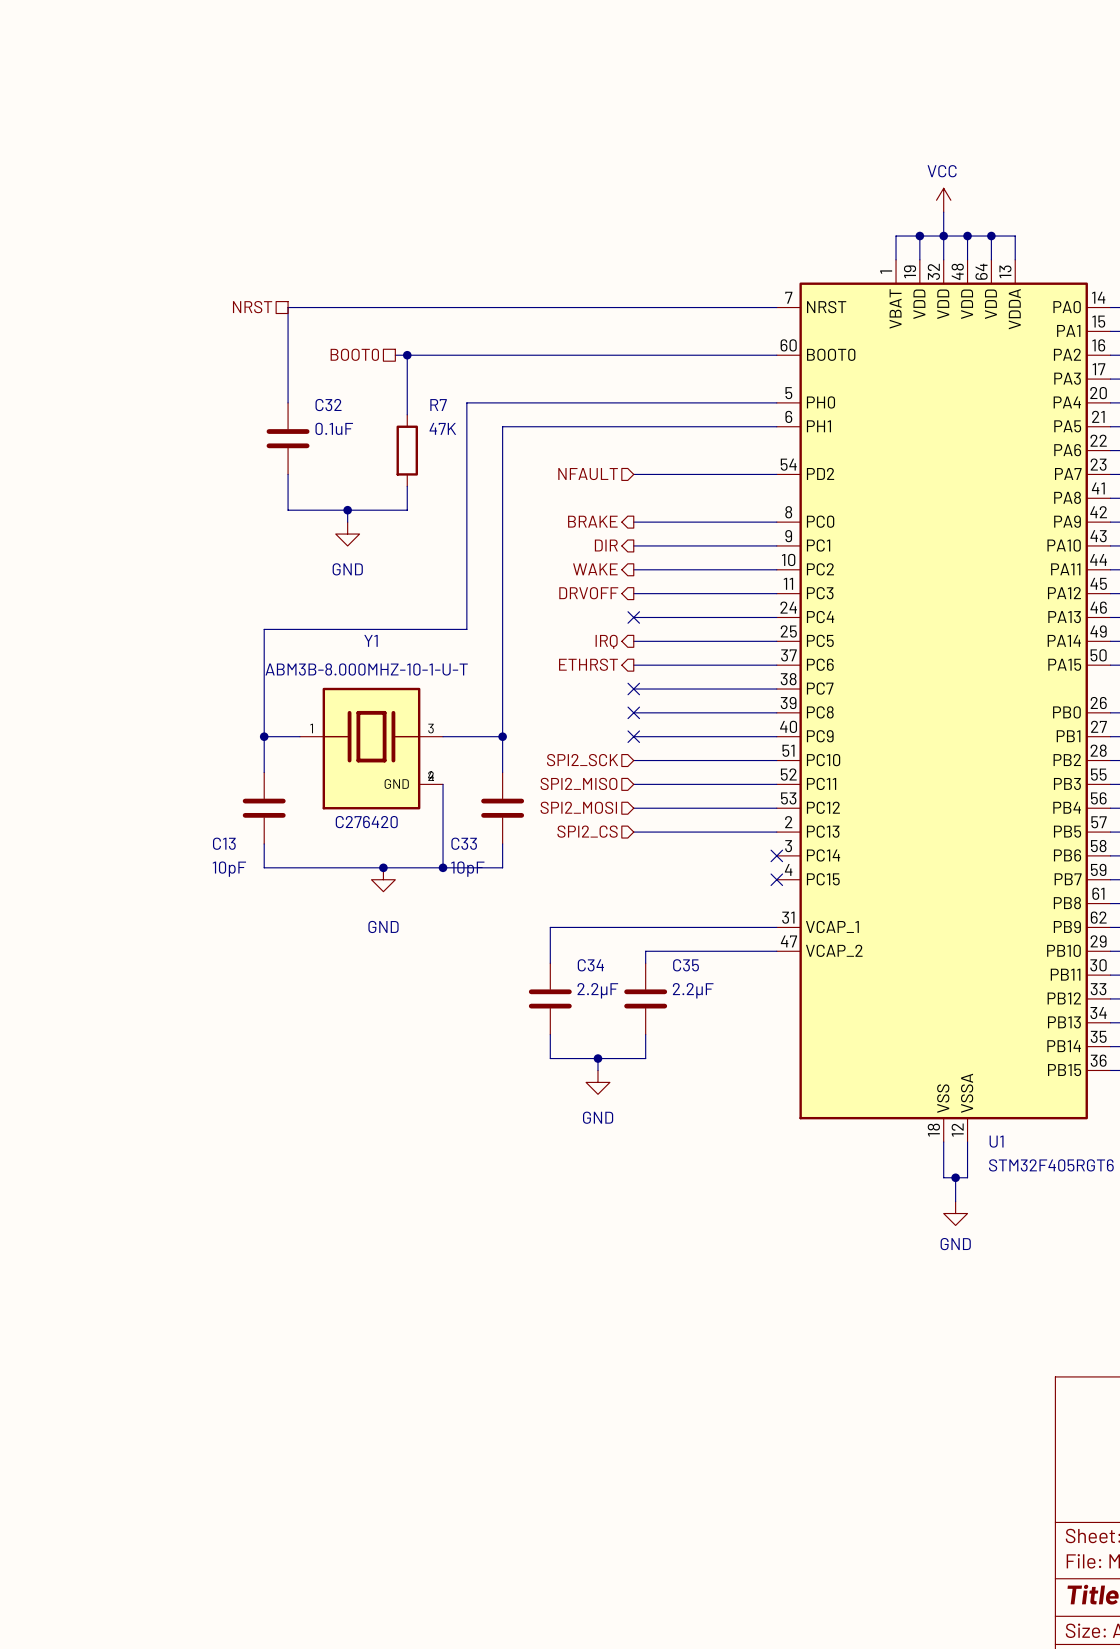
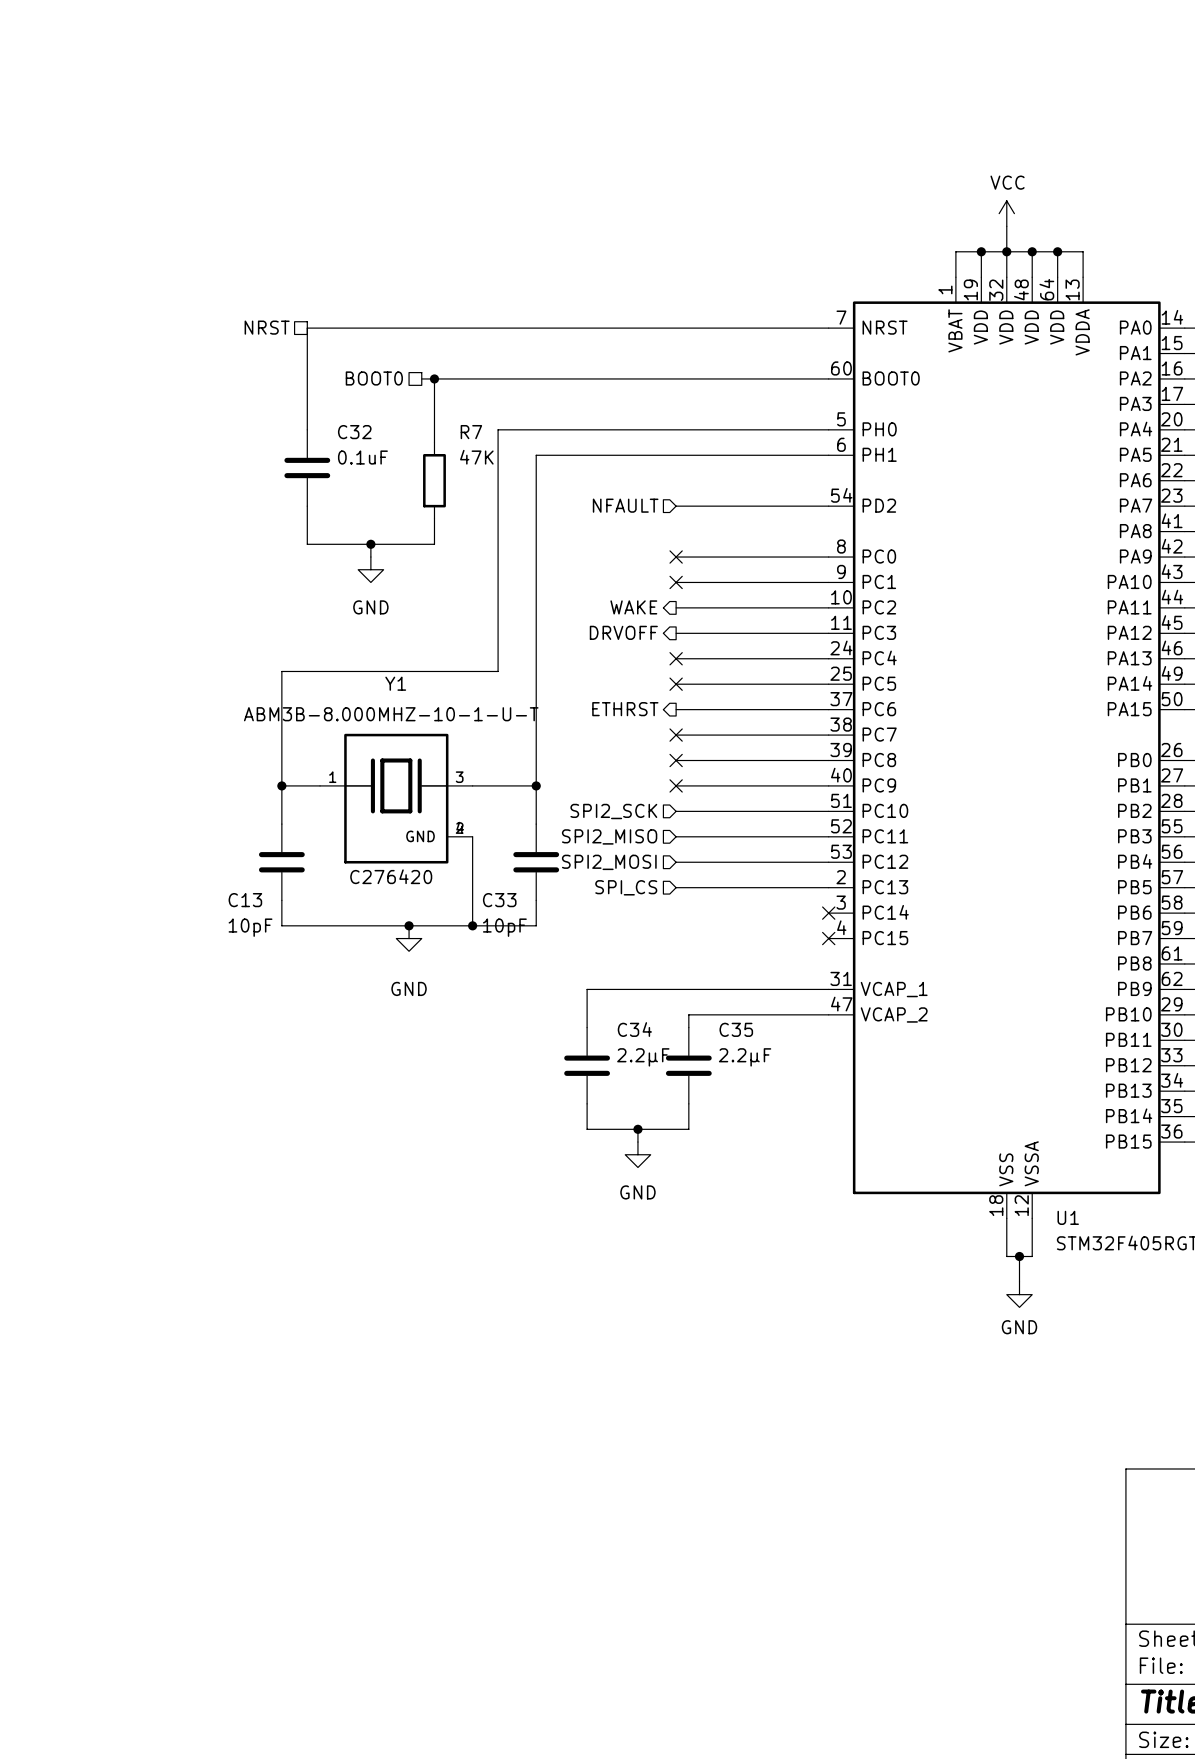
hierarchical label: BRAKE (592, 521) -> none
no-connect mark: none -> (676, 557)
hierarchical label: DIR (606, 545) -> none
no-connect mark: none -> (676, 582)
hierarchical label: IRQ (606, 641) -> none
no-connect mark: none -> (676, 684)
hierarchical label: SPI2_CS (587, 831) -> SPI_CS (626, 887)

